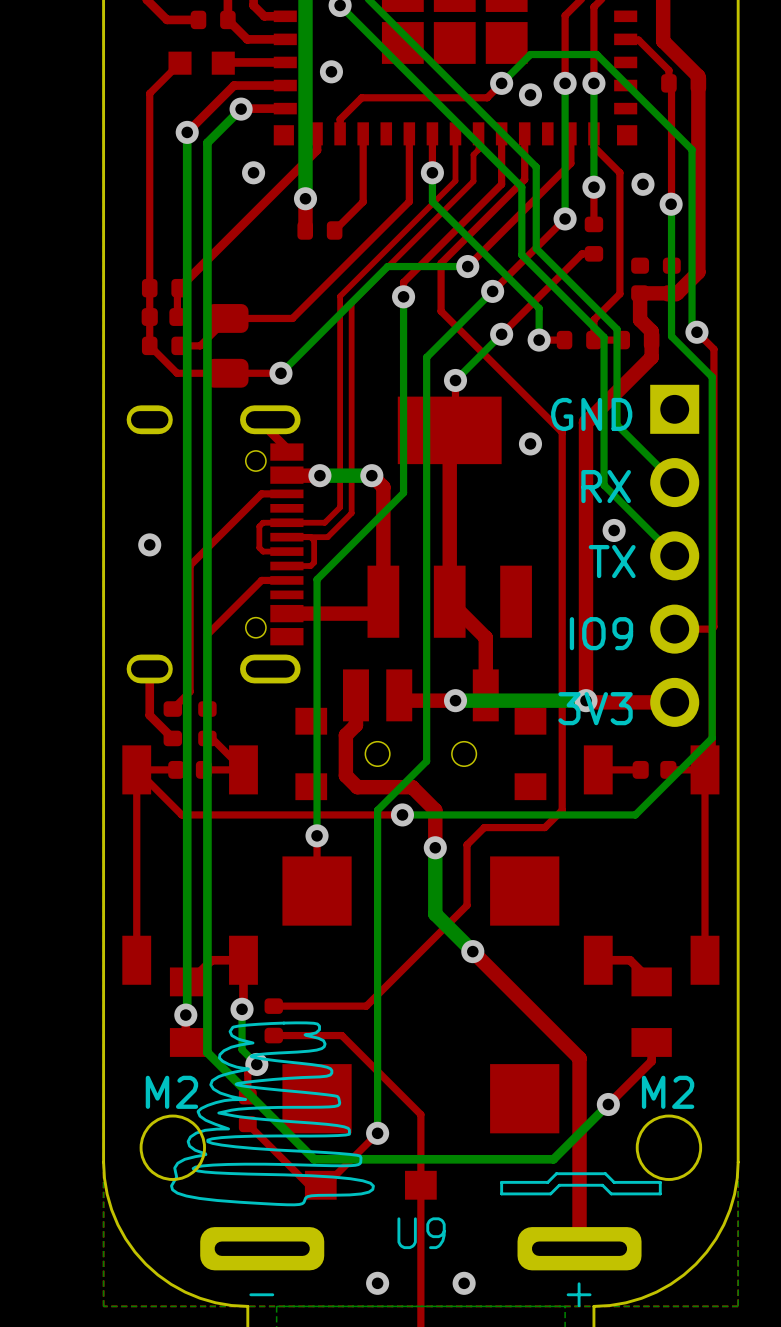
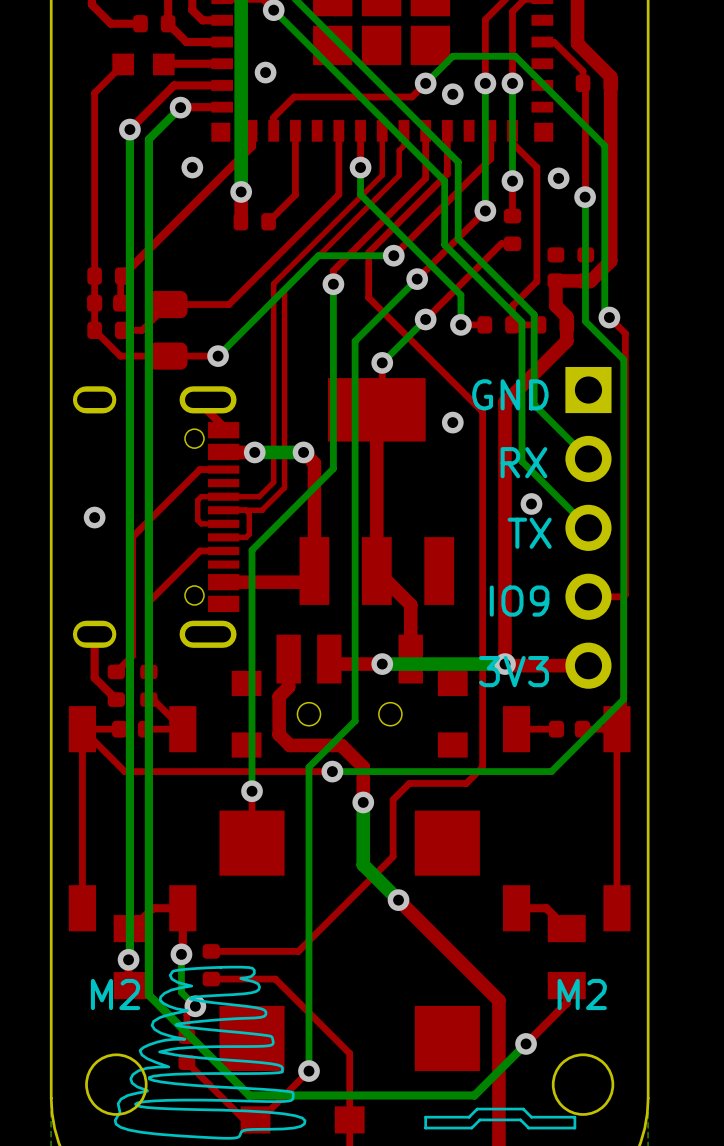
text position: M2 (171, 1092) -> M2 (115, 994)
text position: M2 (668, 1092) -> M2 (582, 994)

